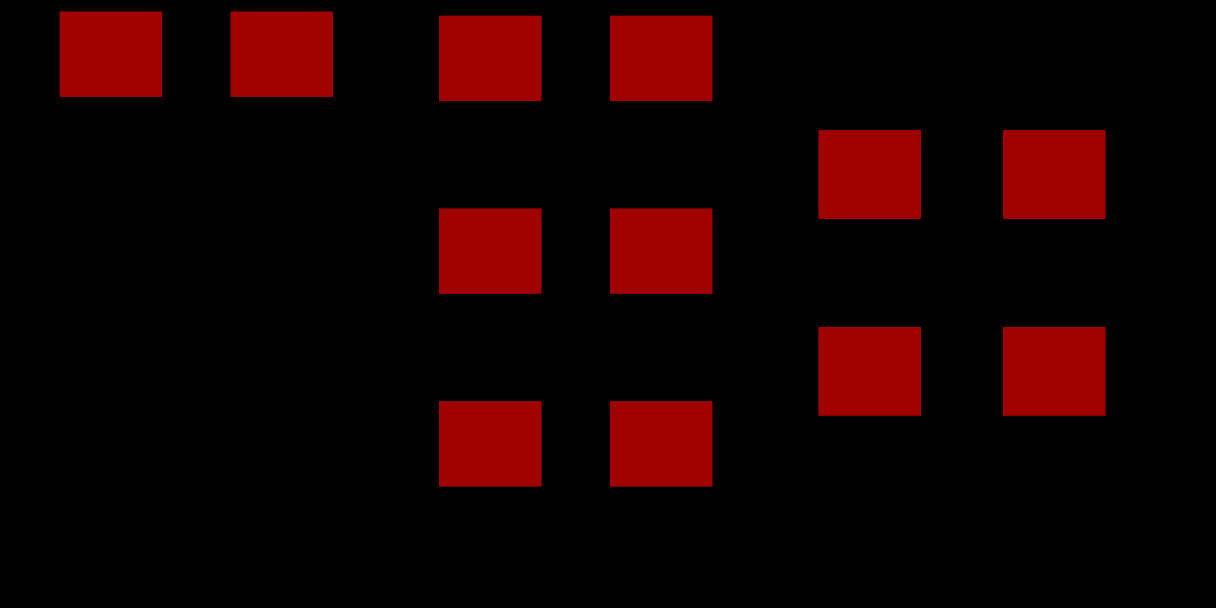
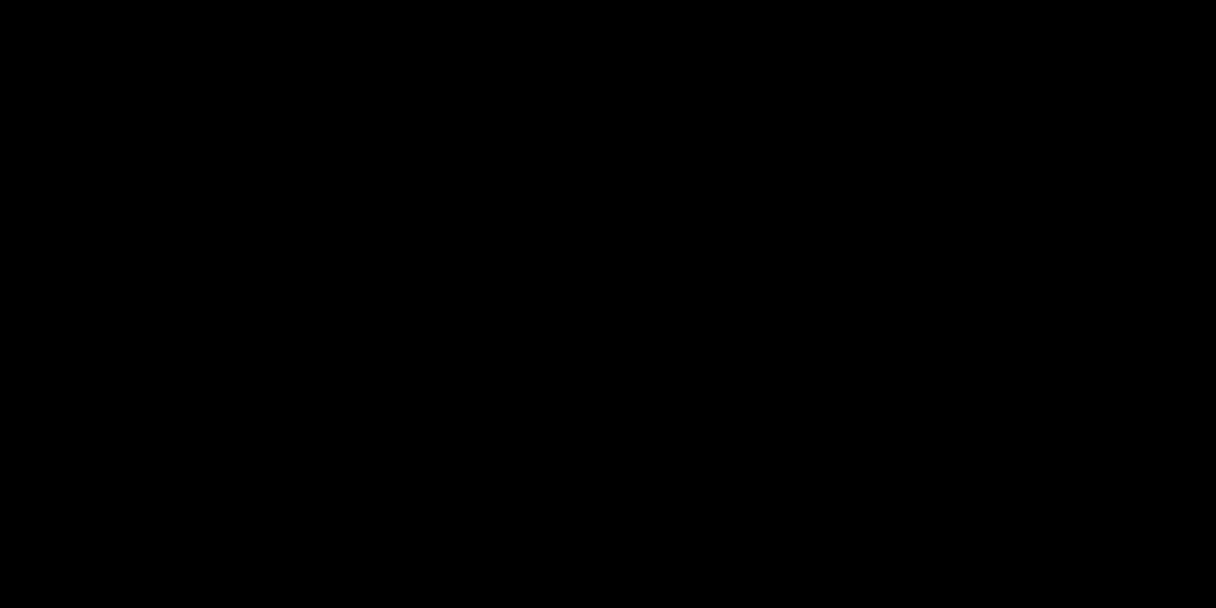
part: (196, 54) -> none
part: (575, 58) -> none
part: (962, 174) -> none
part: (575, 251) -> none
part: (962, 371) -> none
part: (575, 443) -> none

